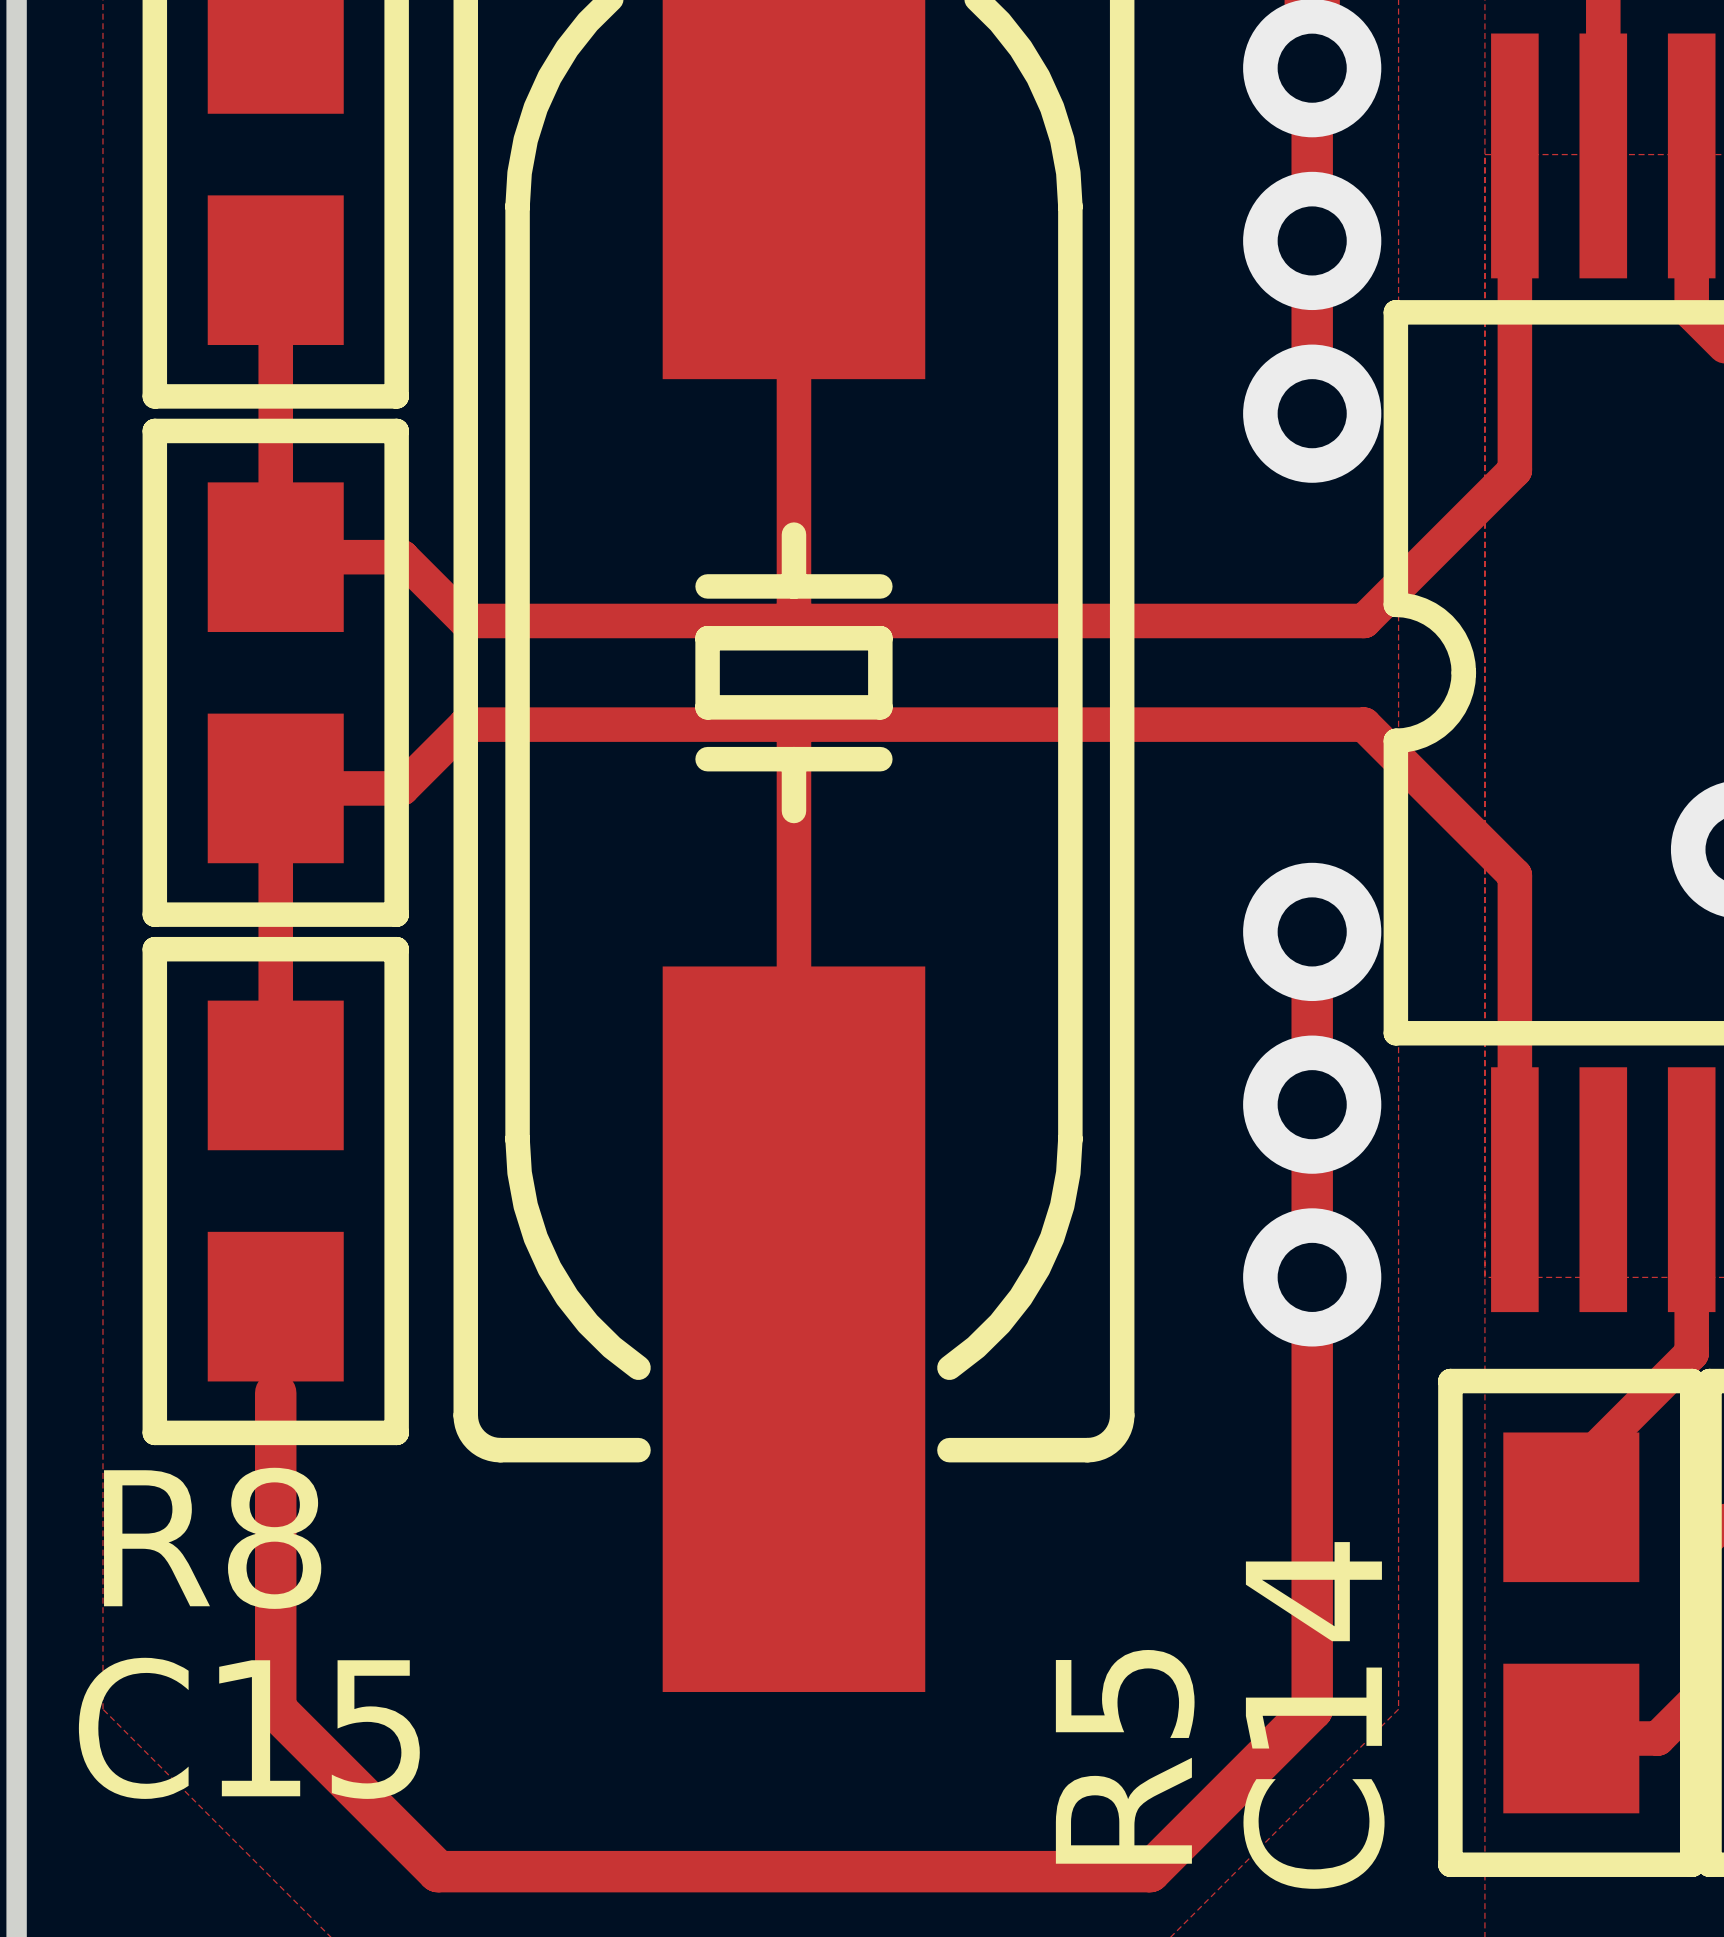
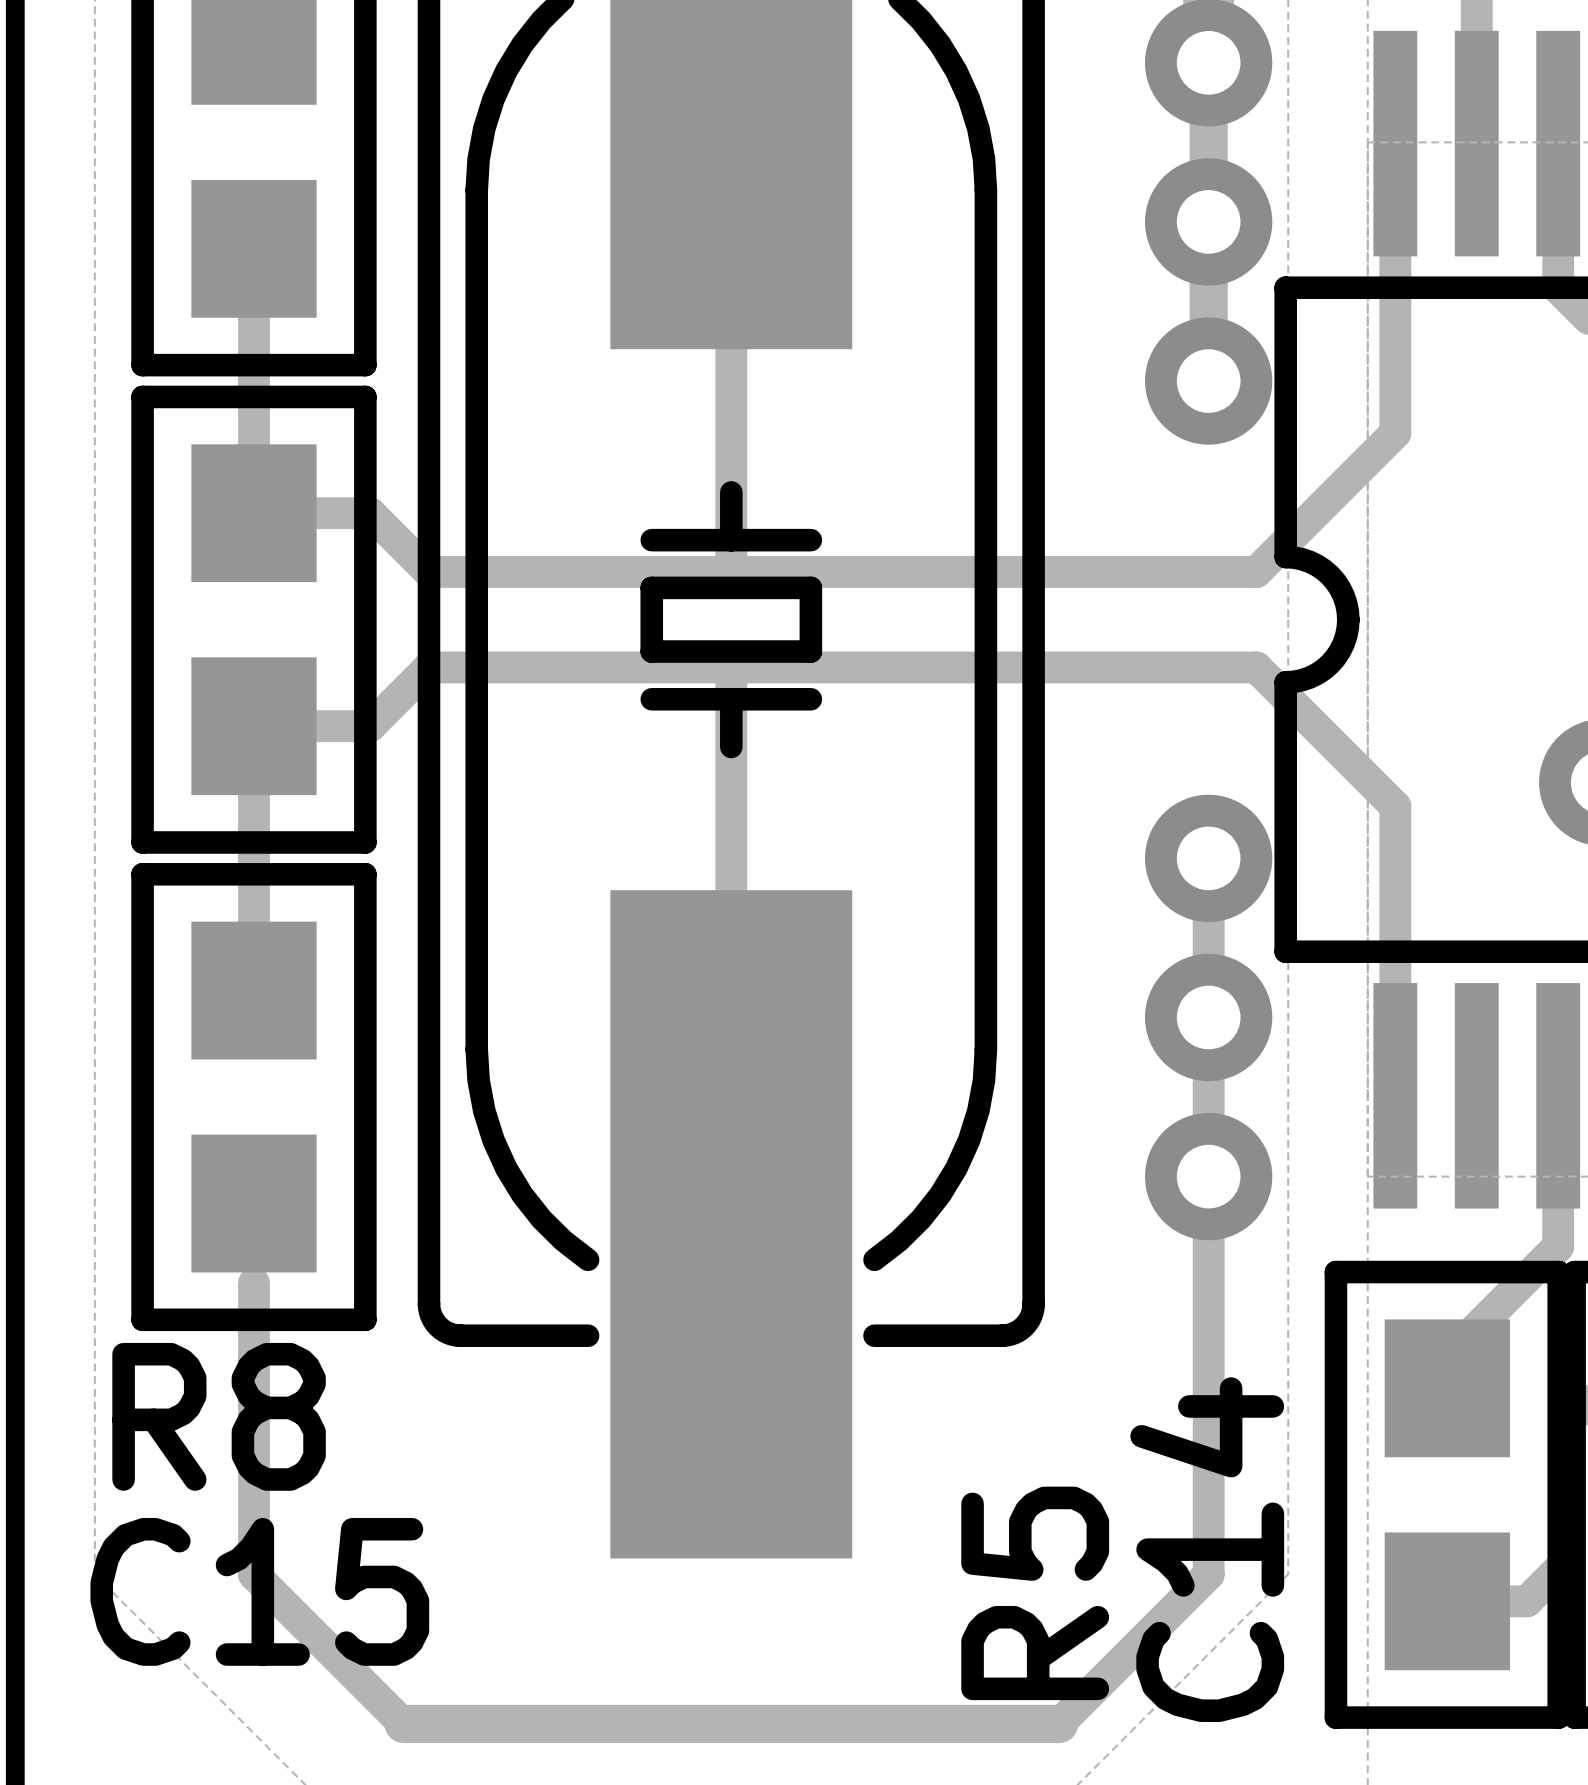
track width: thick (1312, 931) (1312, 1709) (1149, 1871) -> thin (1208, 858) (1208, 1574) (1059, 1723)
track width: thick (275, 1393) (275, 1709) (438, 1871) -> thin (253, 1283) (253, 1574) (403, 1723)

